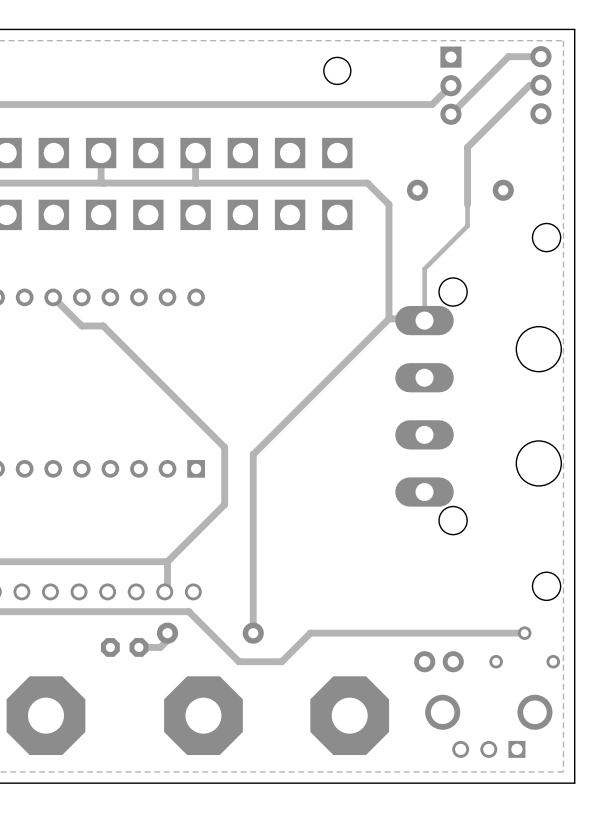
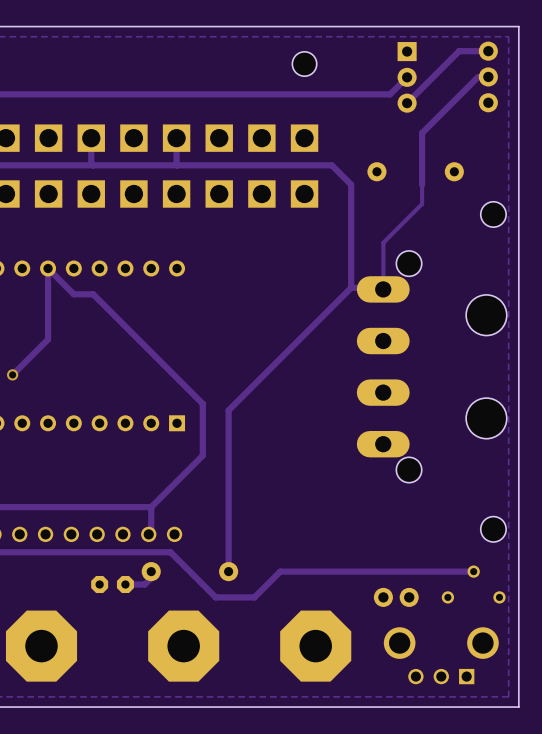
track: none -> (48, 268) (48, 339) (12, 374)
via: none -> (12, 374)

